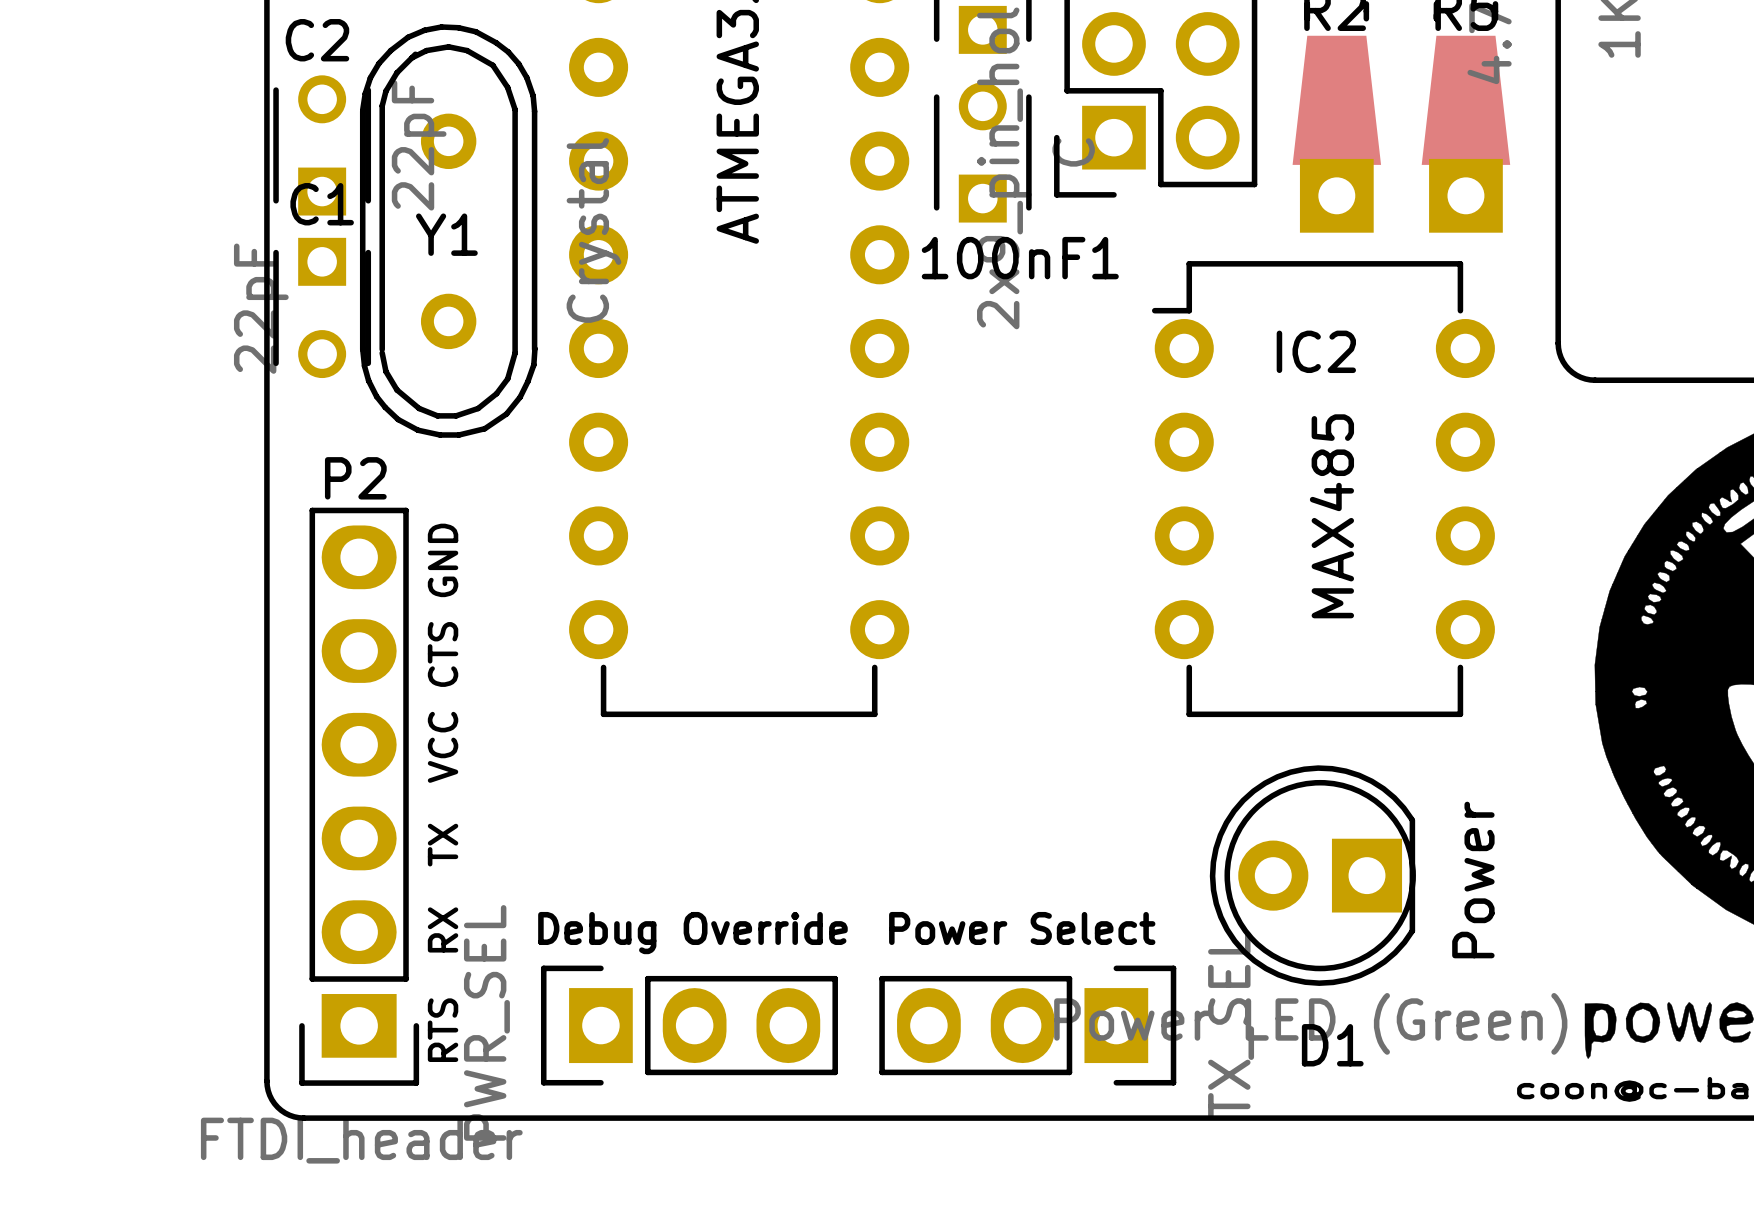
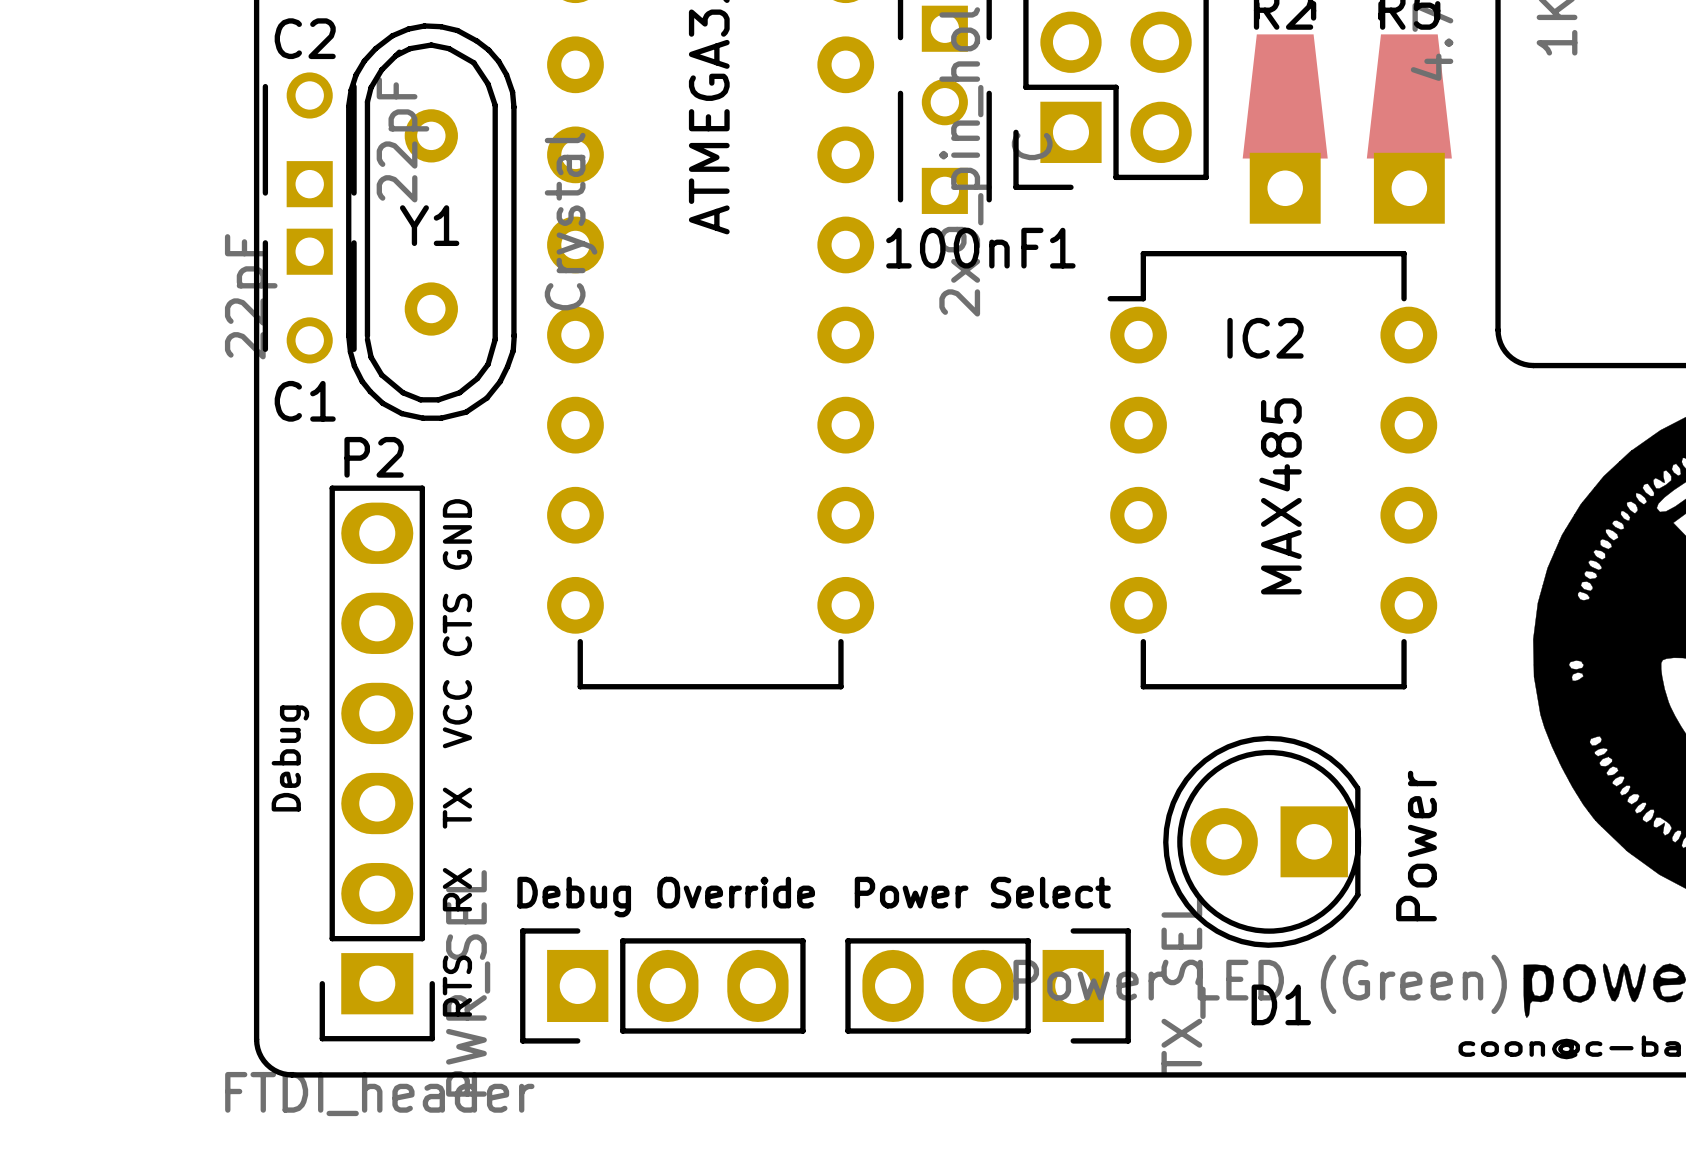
C1 name position: C1 (322, 204) -> C1 (305, 401)
text: none -> Debug (290, 758)
text position: RTS RX TX VCC CTS GND (443, 792) -> RTS RX TX VCC CTS GND (457, 757)
P2 position: (359, 796) -> (377, 763)

